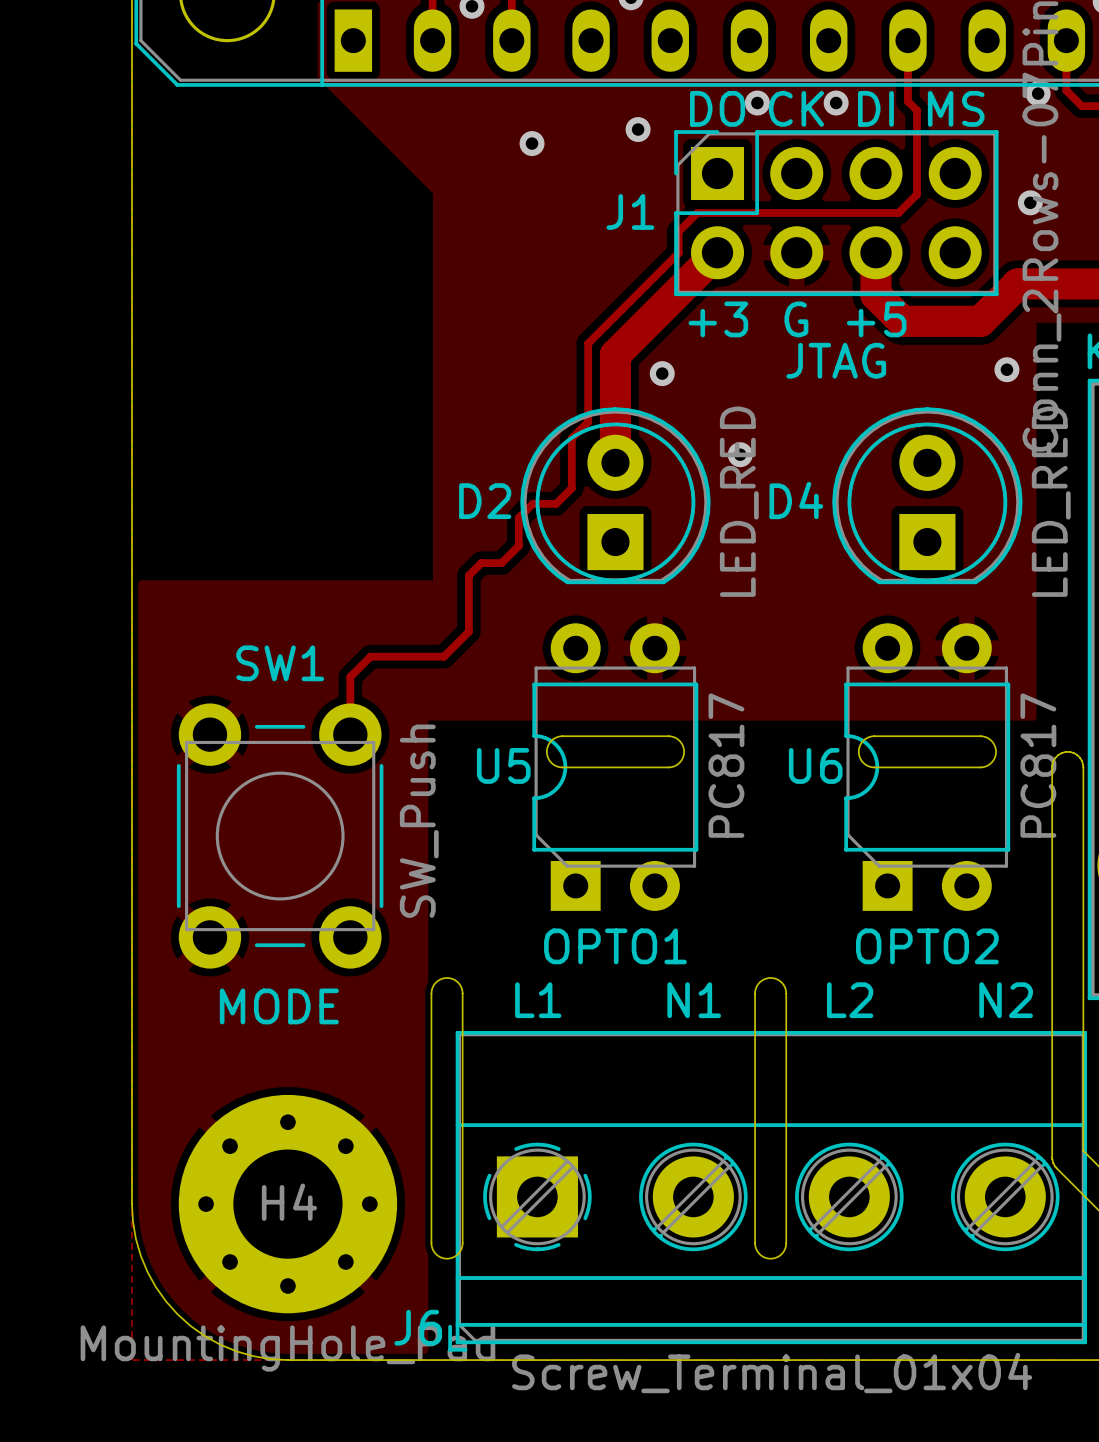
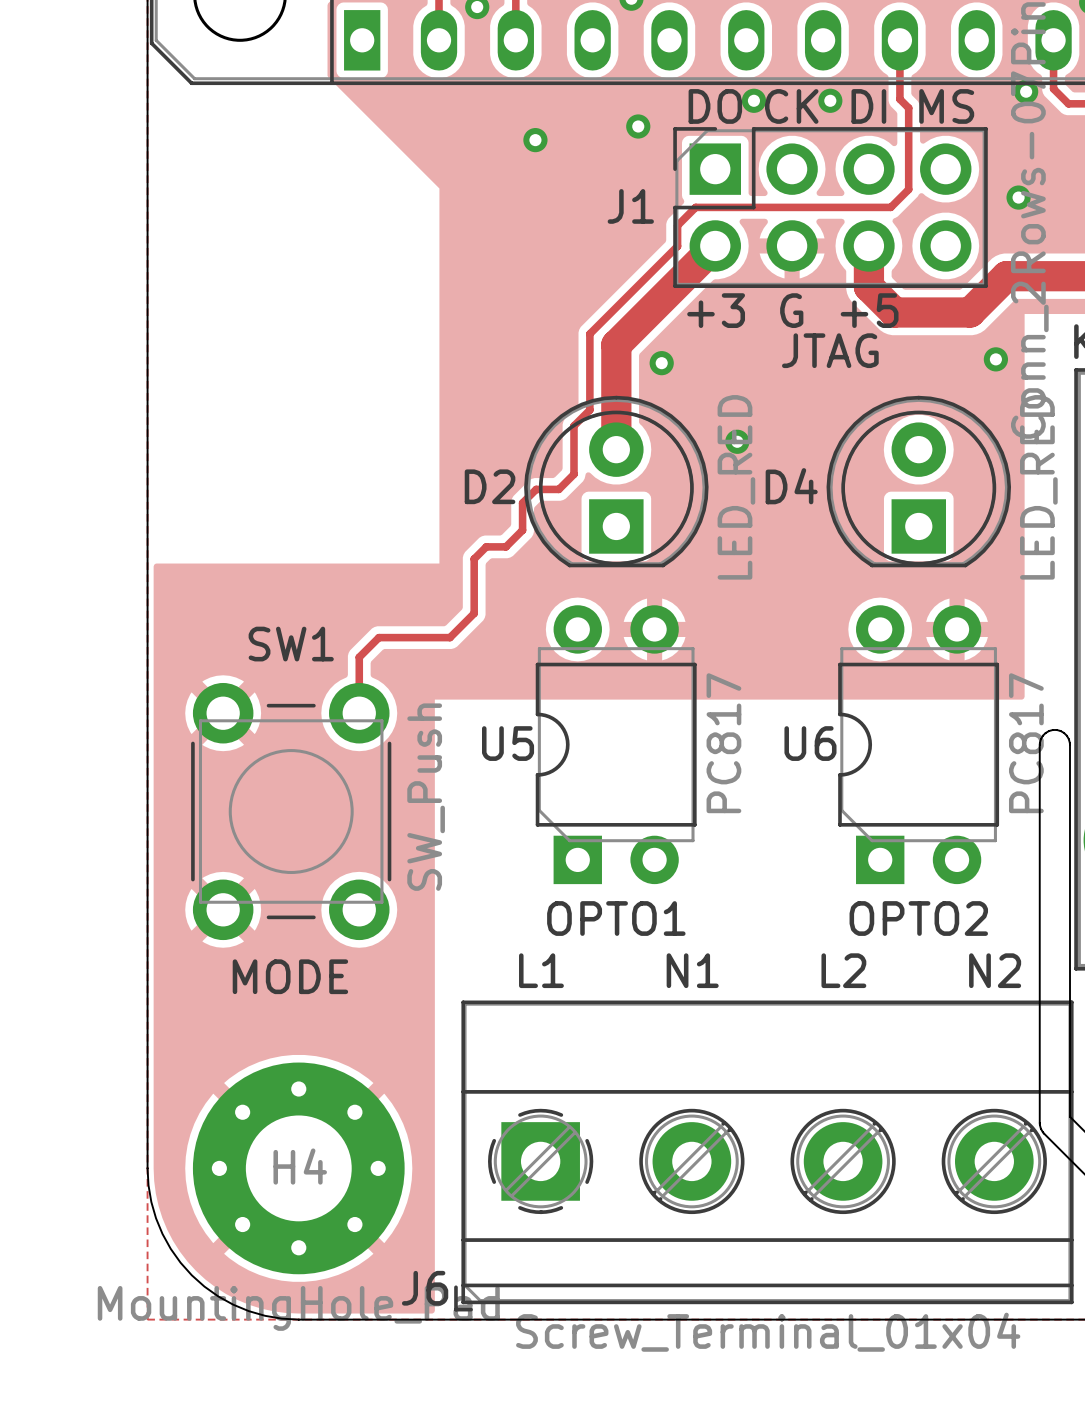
board edge: (562, 736) (670, 736) (680, 741) (683, 753) (678, 763) (670, 767) (560, 767) (550, 761) (546, 749) (552, 739) (562, 736) -> none
board edge: (874, 736) (982, 736) (992, 742) (995, 753) (991, 762) (982, 767) (872, 767) (862, 761) (858, 749) (864, 739) (874, 736) -> none
board edge: (431, 993) (431, 1243) (436, 1254) (447, 1258) (458, 1254) (462, 1243) (462, 993) (458, 982) (447, 977) (436, 982) (431, 993) -> none
board edge: (755, 993) (755, 1243) (759, 1254) (770, 1258) (781, 1254) (786, 1243) (786, 993) (781, 982) (770, 977) (759, 982) (755, 993) -> none

